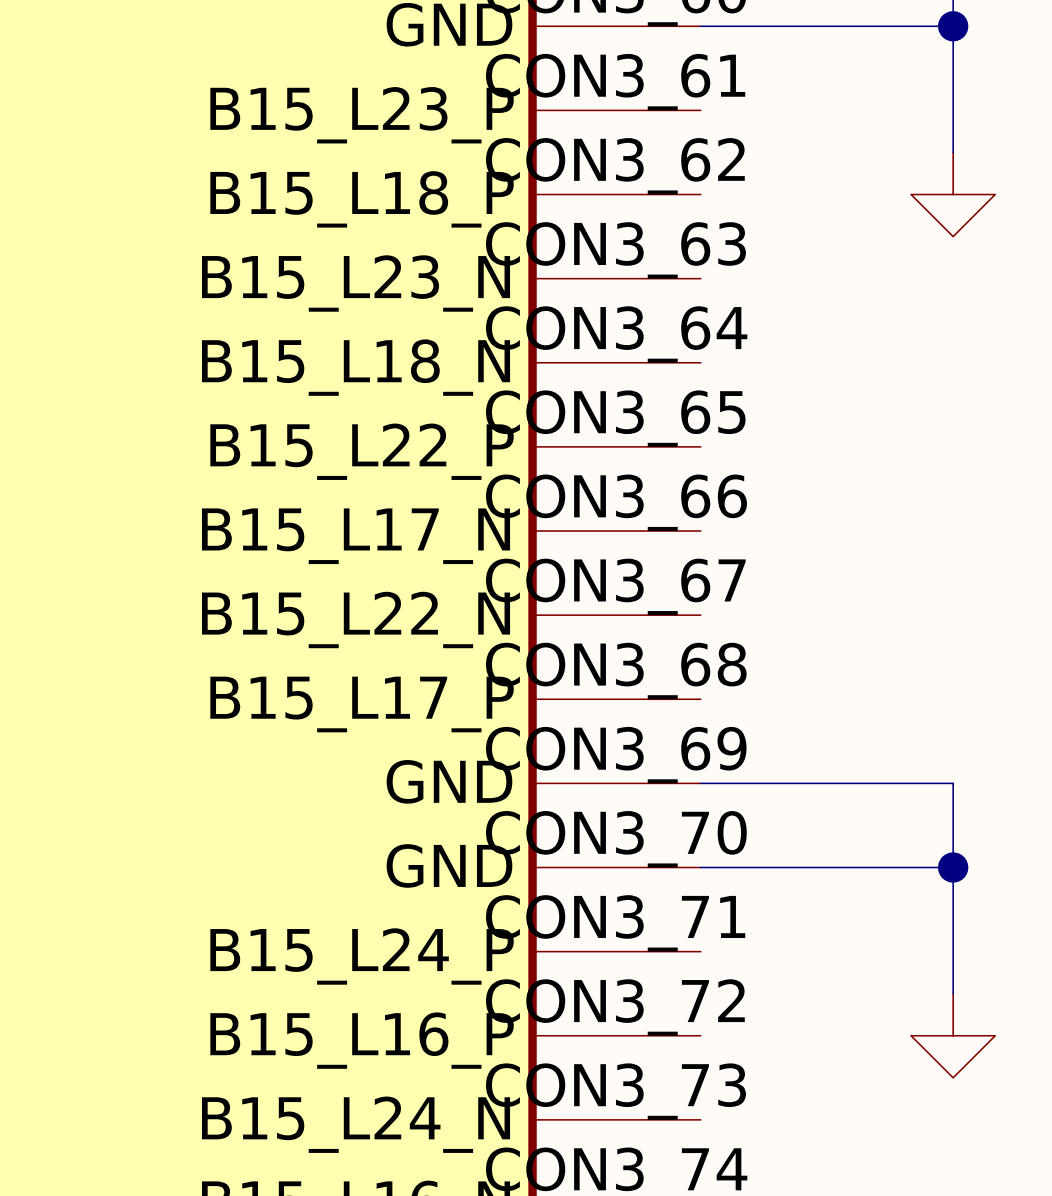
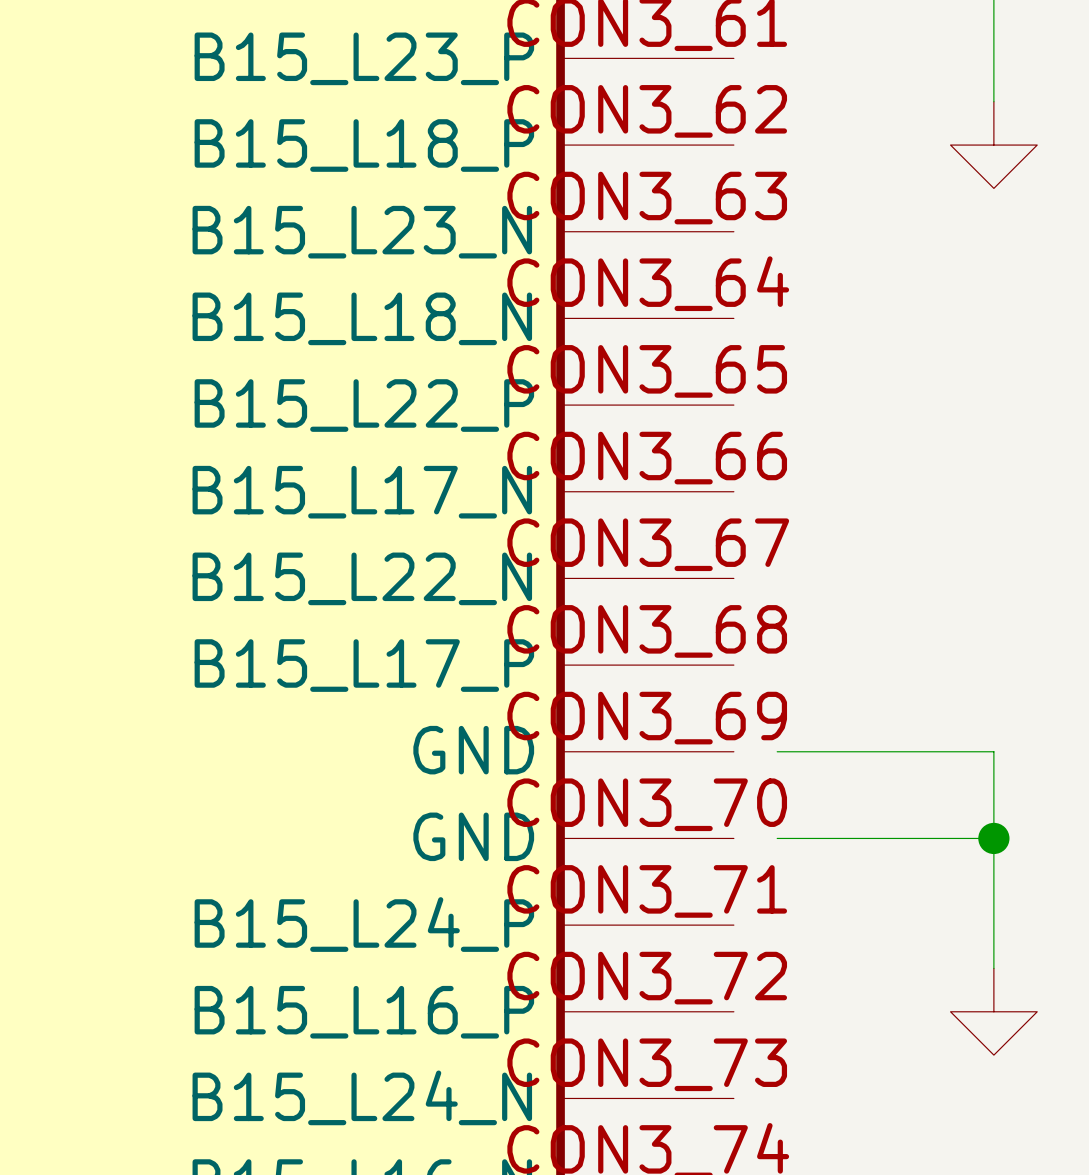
wire: (700, 783) (742, 783) -> none
wire: (700, 867) (742, 867) -> none

